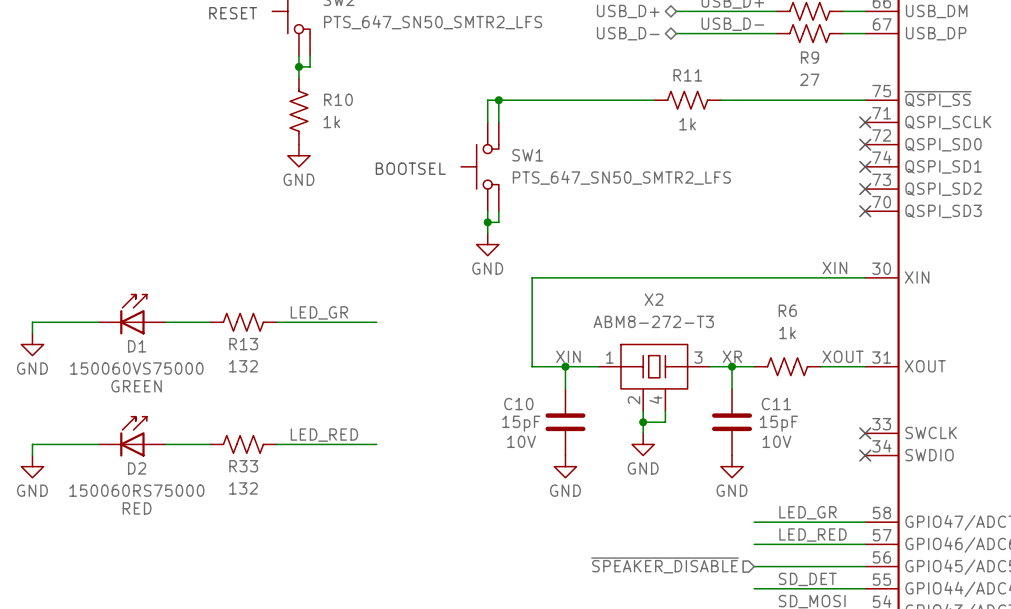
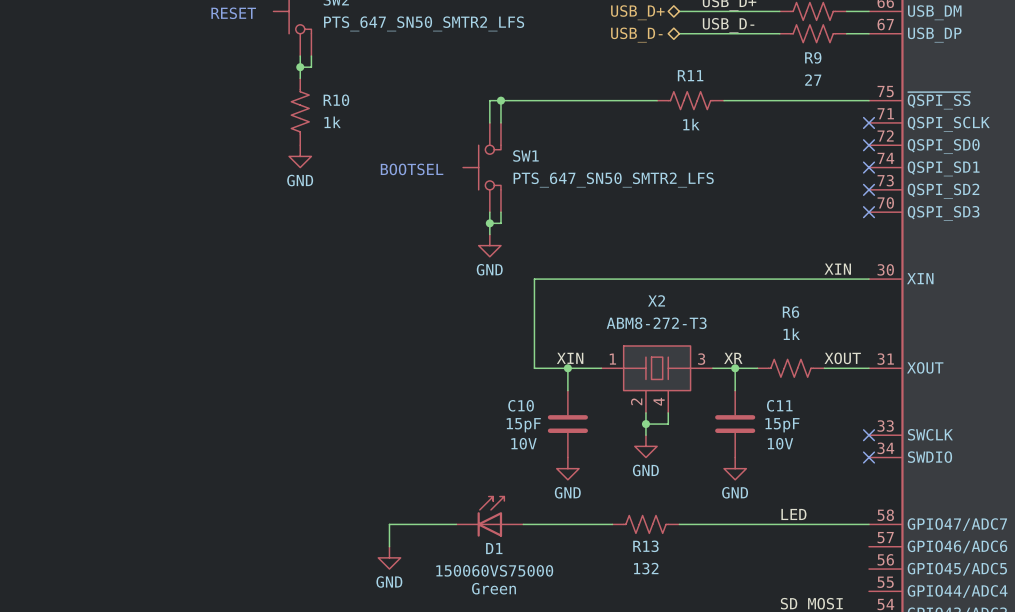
label: LED_GR (319, 312) -> none
D1 position: (132, 314) -> (489, 516)
wire: (99, 322) (32, 322) (32, 333) -> none
wire: (165, 322) (210, 322) -> none
R13 position: (243, 322) -> (645, 524)
wire: (276, 322) (376, 322) -> none
power symbol: GND (32, 344) -> none
D1 text: GREEN (136, 386) -> Green (494, 588)
label: LED_RED (324, 435) -> none
D2: 150060RS75000 (132, 436) -> none
wire: (99, 444) (32, 444) (32, 455) -> none
wire: (165, 444) (210, 444) -> none
R33: 132 (243, 444) -> none
wire: (276, 444) (376, 444) -> none
power symbol: GND (32, 466) -> none
label: LED_GR (807, 512) -> LED (793, 514)
wire: none -> (456, 524) (389, 524) (389, 546)
wire: none -> (523, 524) (612, 524)
wire: none -> (679, 524) (757, 524)
label: LED_RED (813, 534) -> none
wire: (754, 544) (865, 544) -> none
power symbol: none -> GND (389, 557)
hierarchical label: ~{SPEAKER_DISABLE} (664, 565) -> none
wire: (754, 566) (865, 566) -> none
label: SD_DET (807, 579) -> none
wire: (754, 588) (865, 588) -> none

